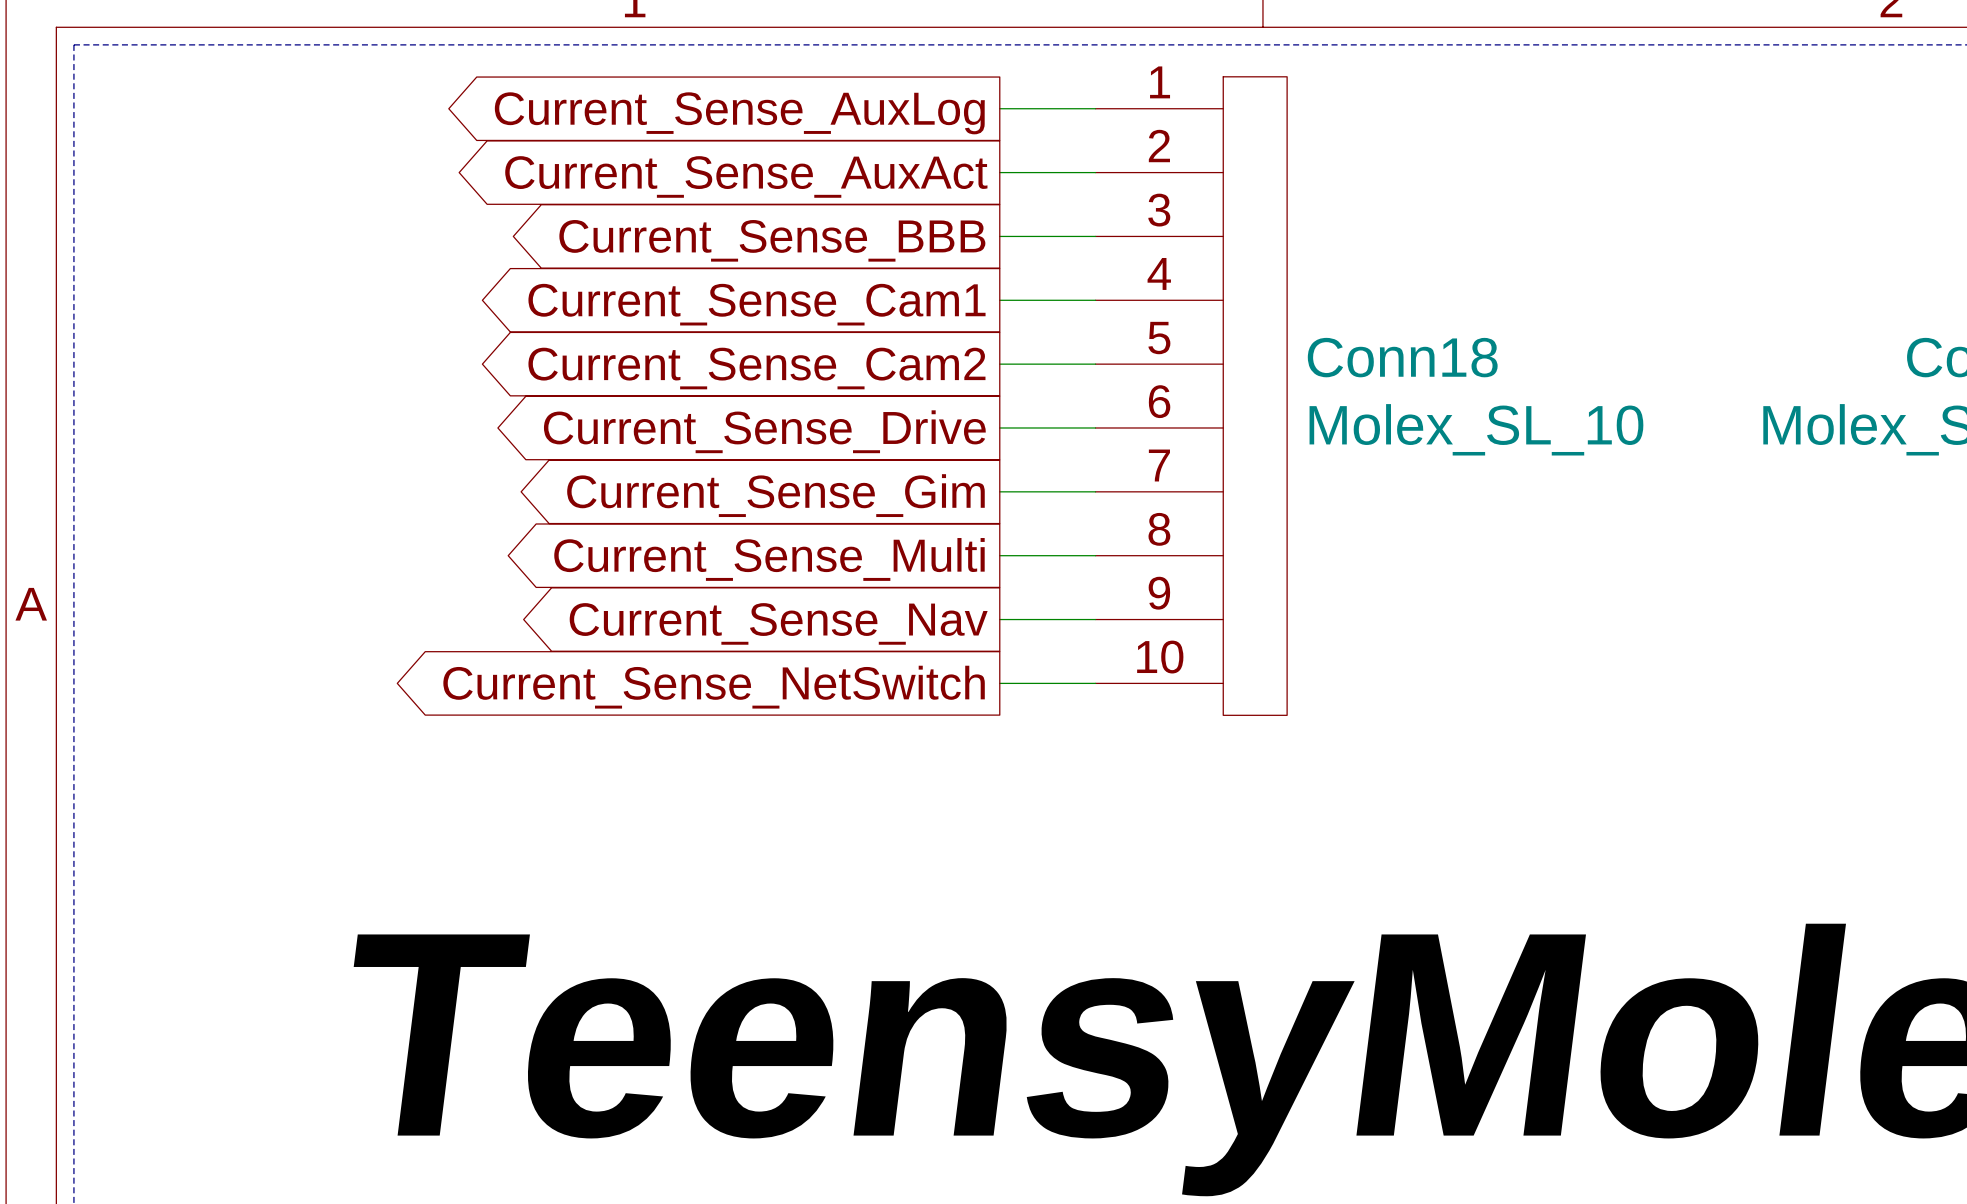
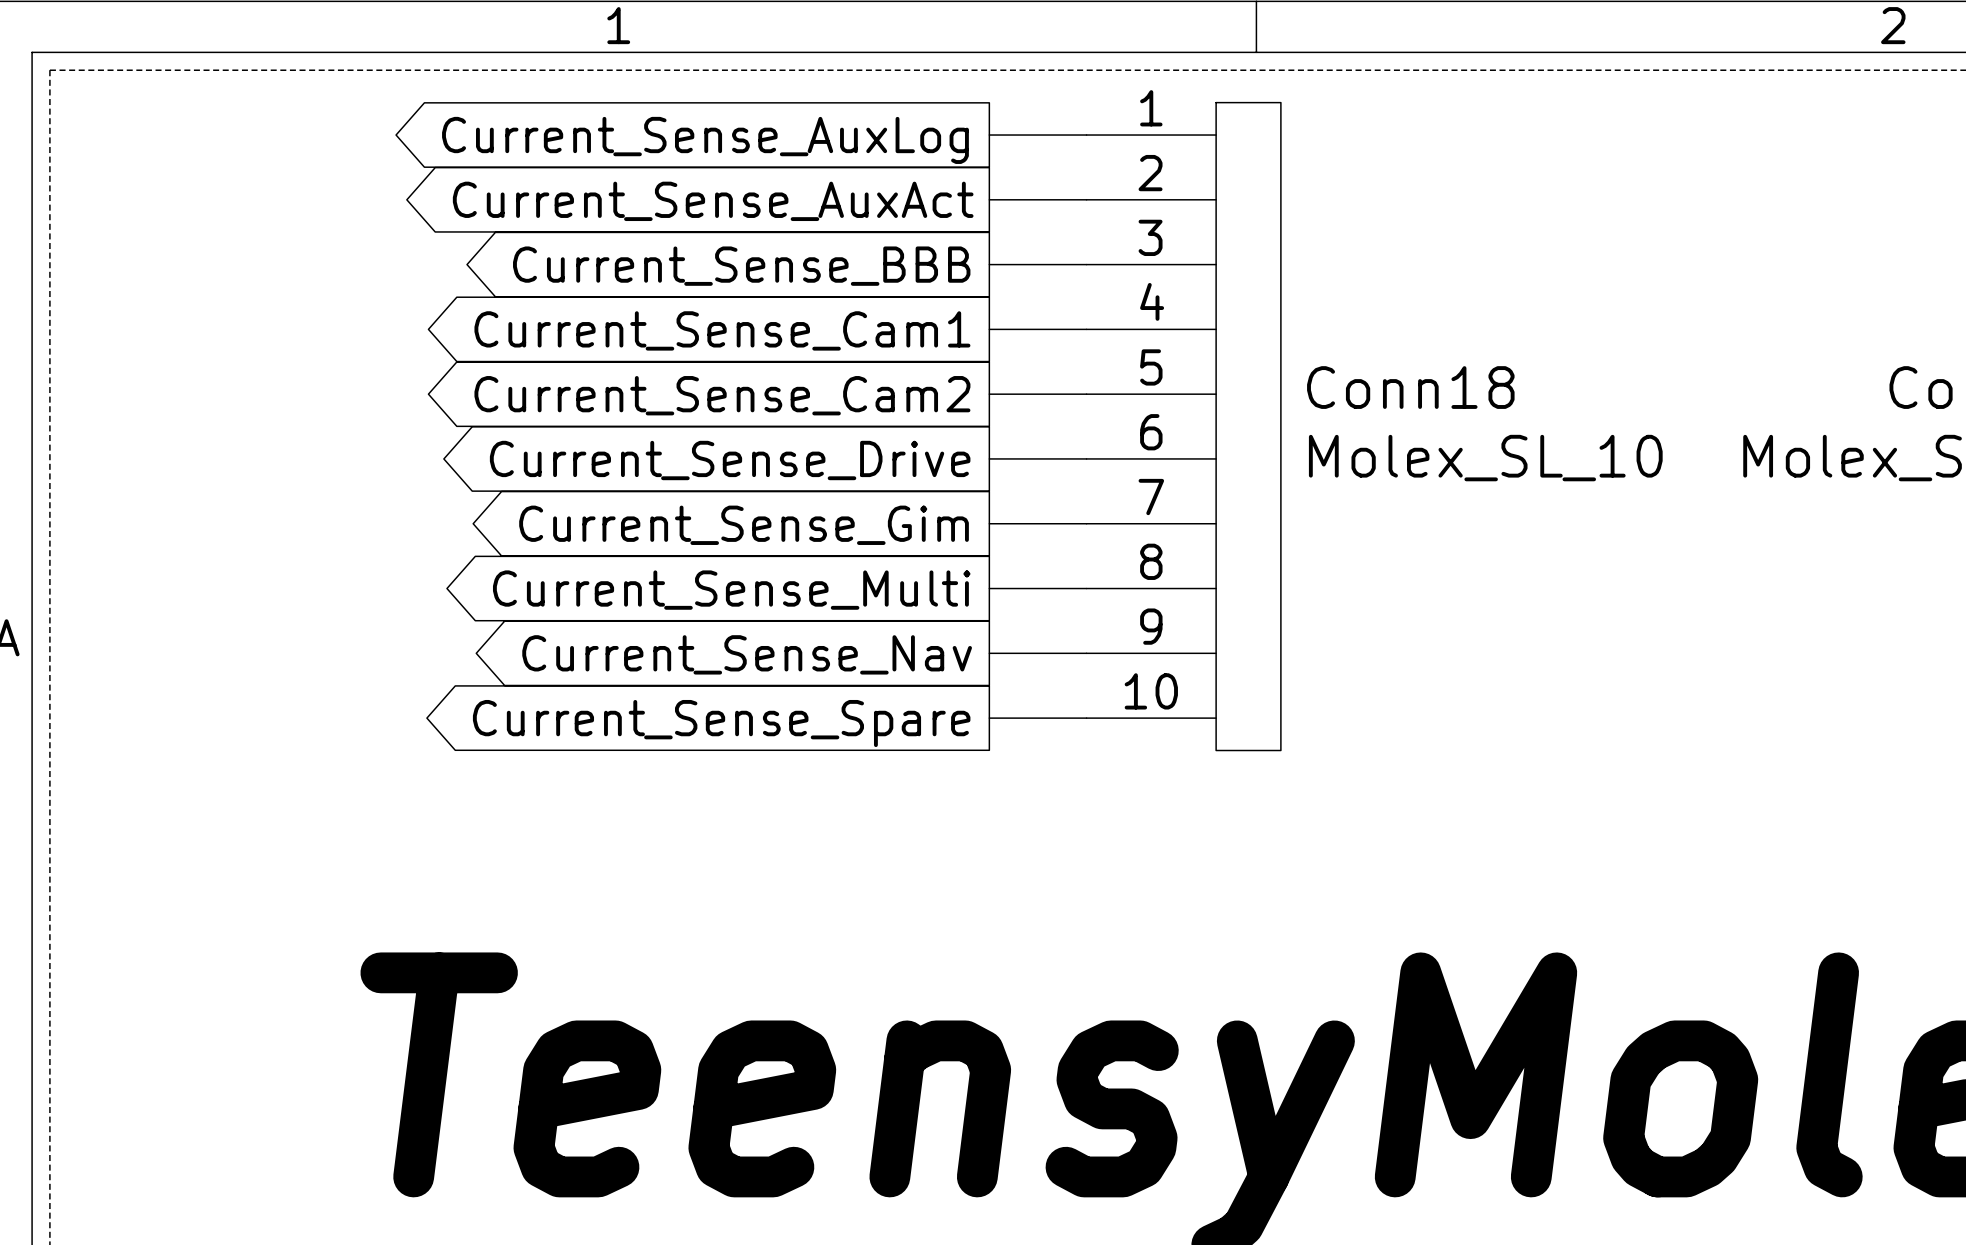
global label: Current_Sense_NetSwitch (714, 687) -> Current_Sense_Spare (721, 723)

